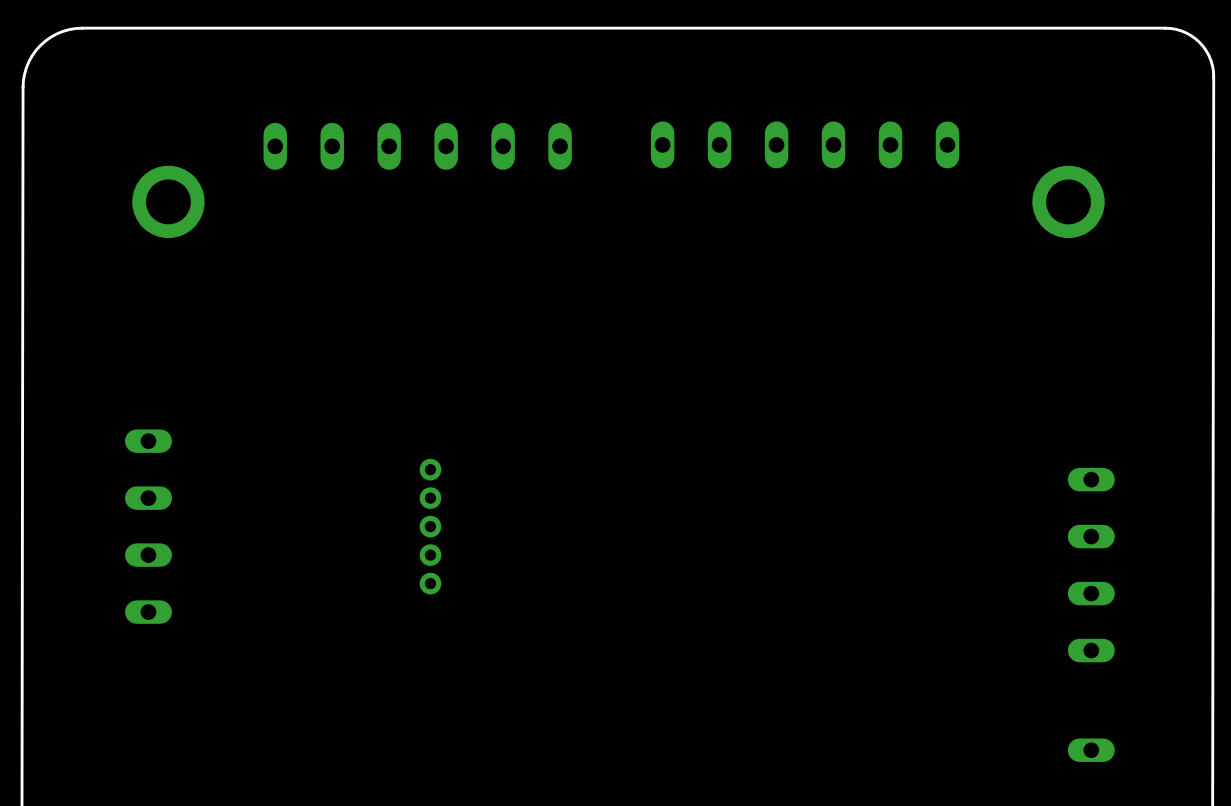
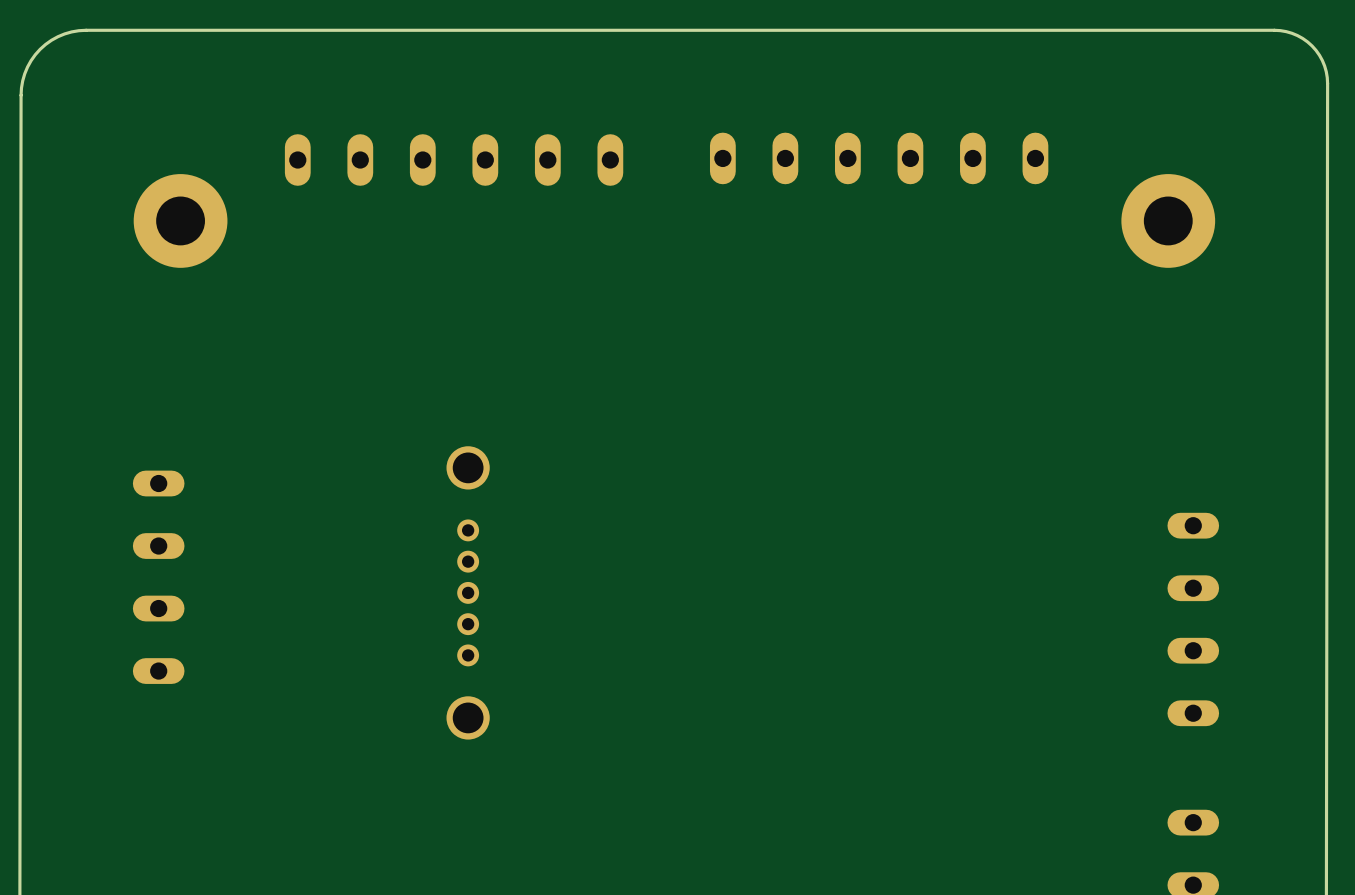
part footprint: [132, 165, 205, 239] -> [133, 174, 228, 268]
part footprint: [1032, 165, 1105, 239] -> [1121, 174, 1216, 268]
part: none -> (468, 467)
part: (430, 526) -> none
part: none -> (468, 592)
part: none -> (468, 717)

